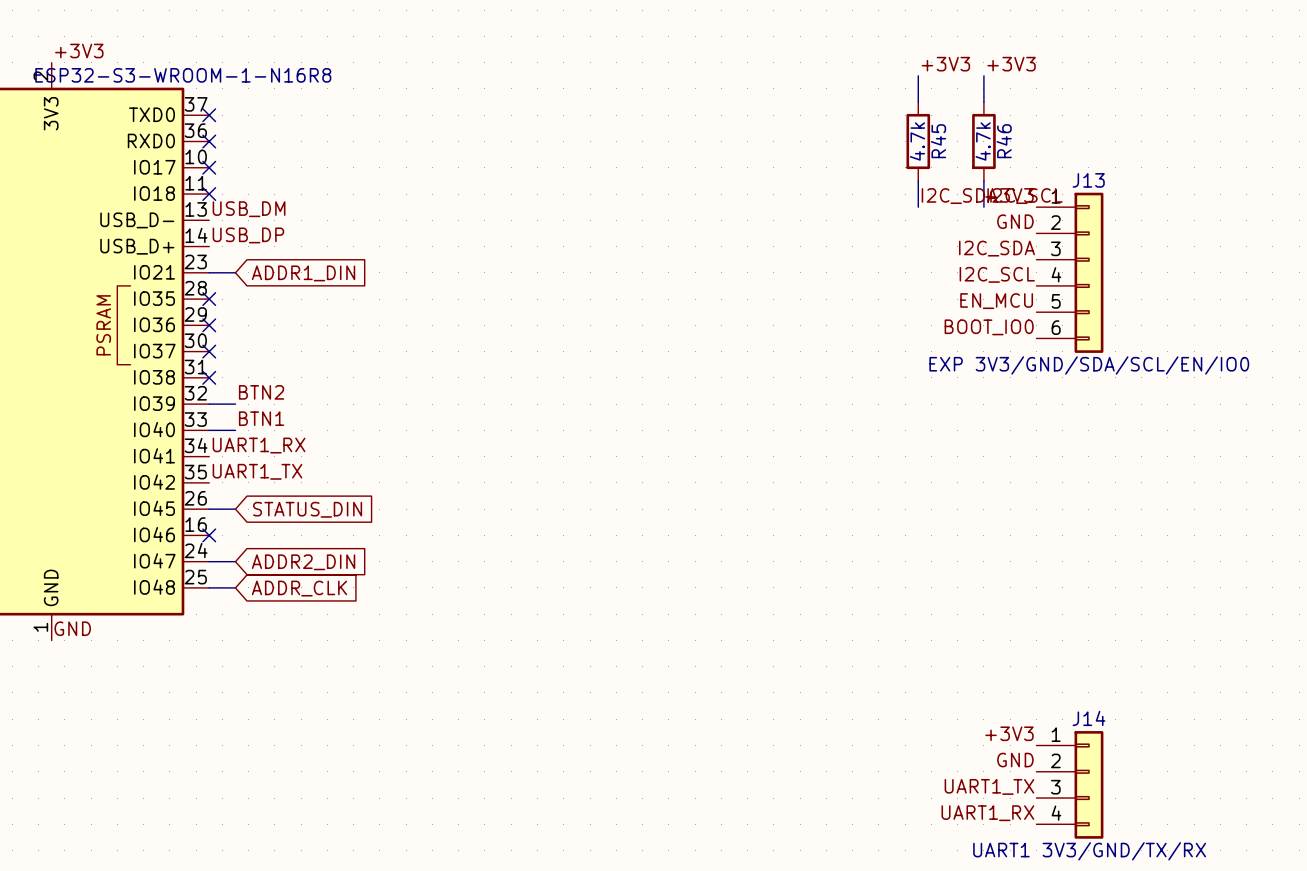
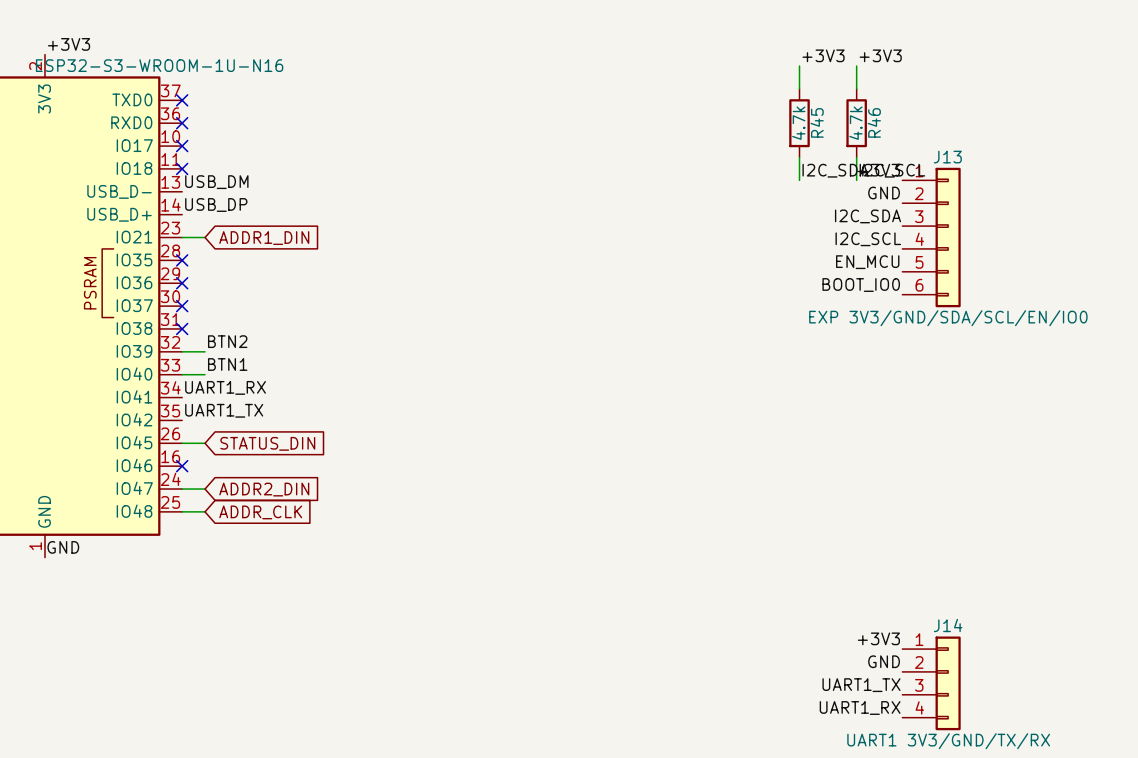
part value: ESP32-S3-WROOM-1-N16R8 (183, 75) -> ESP32-S3-WROOM-1U-N16 (159, 65)

